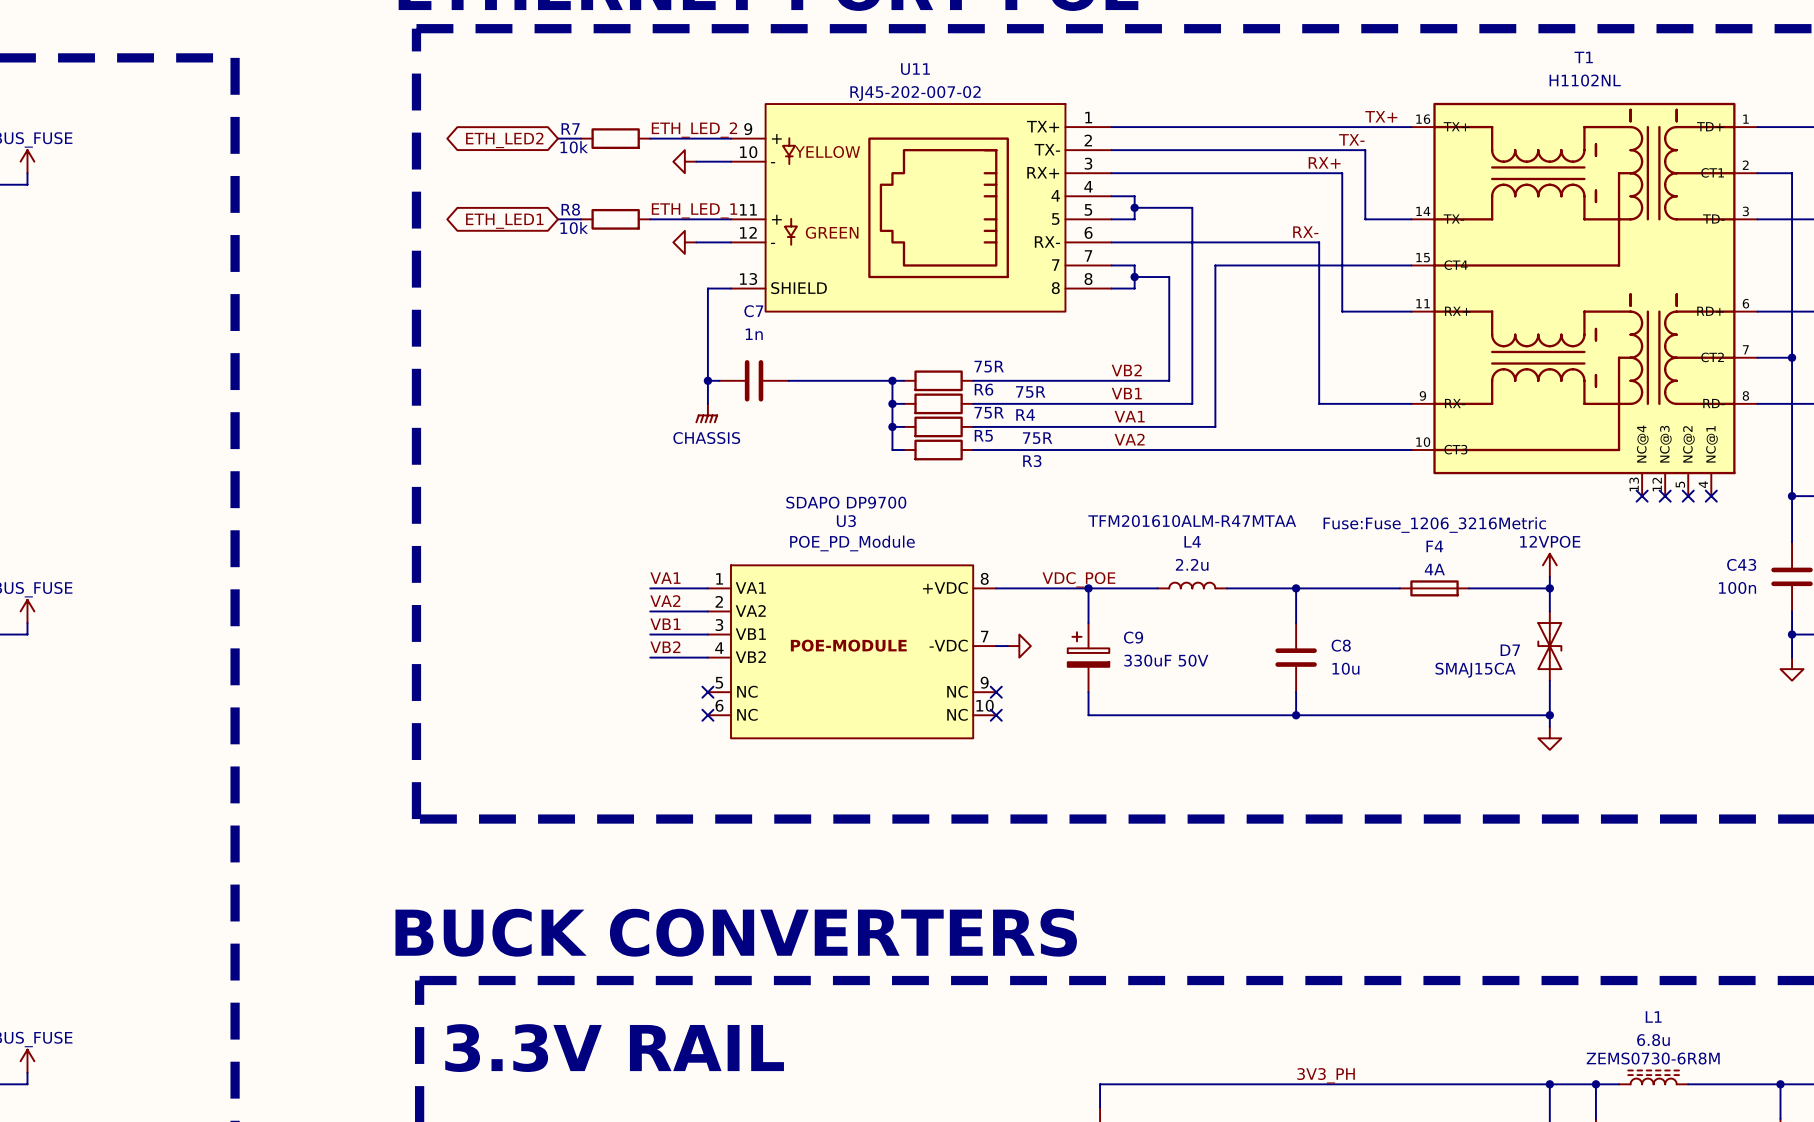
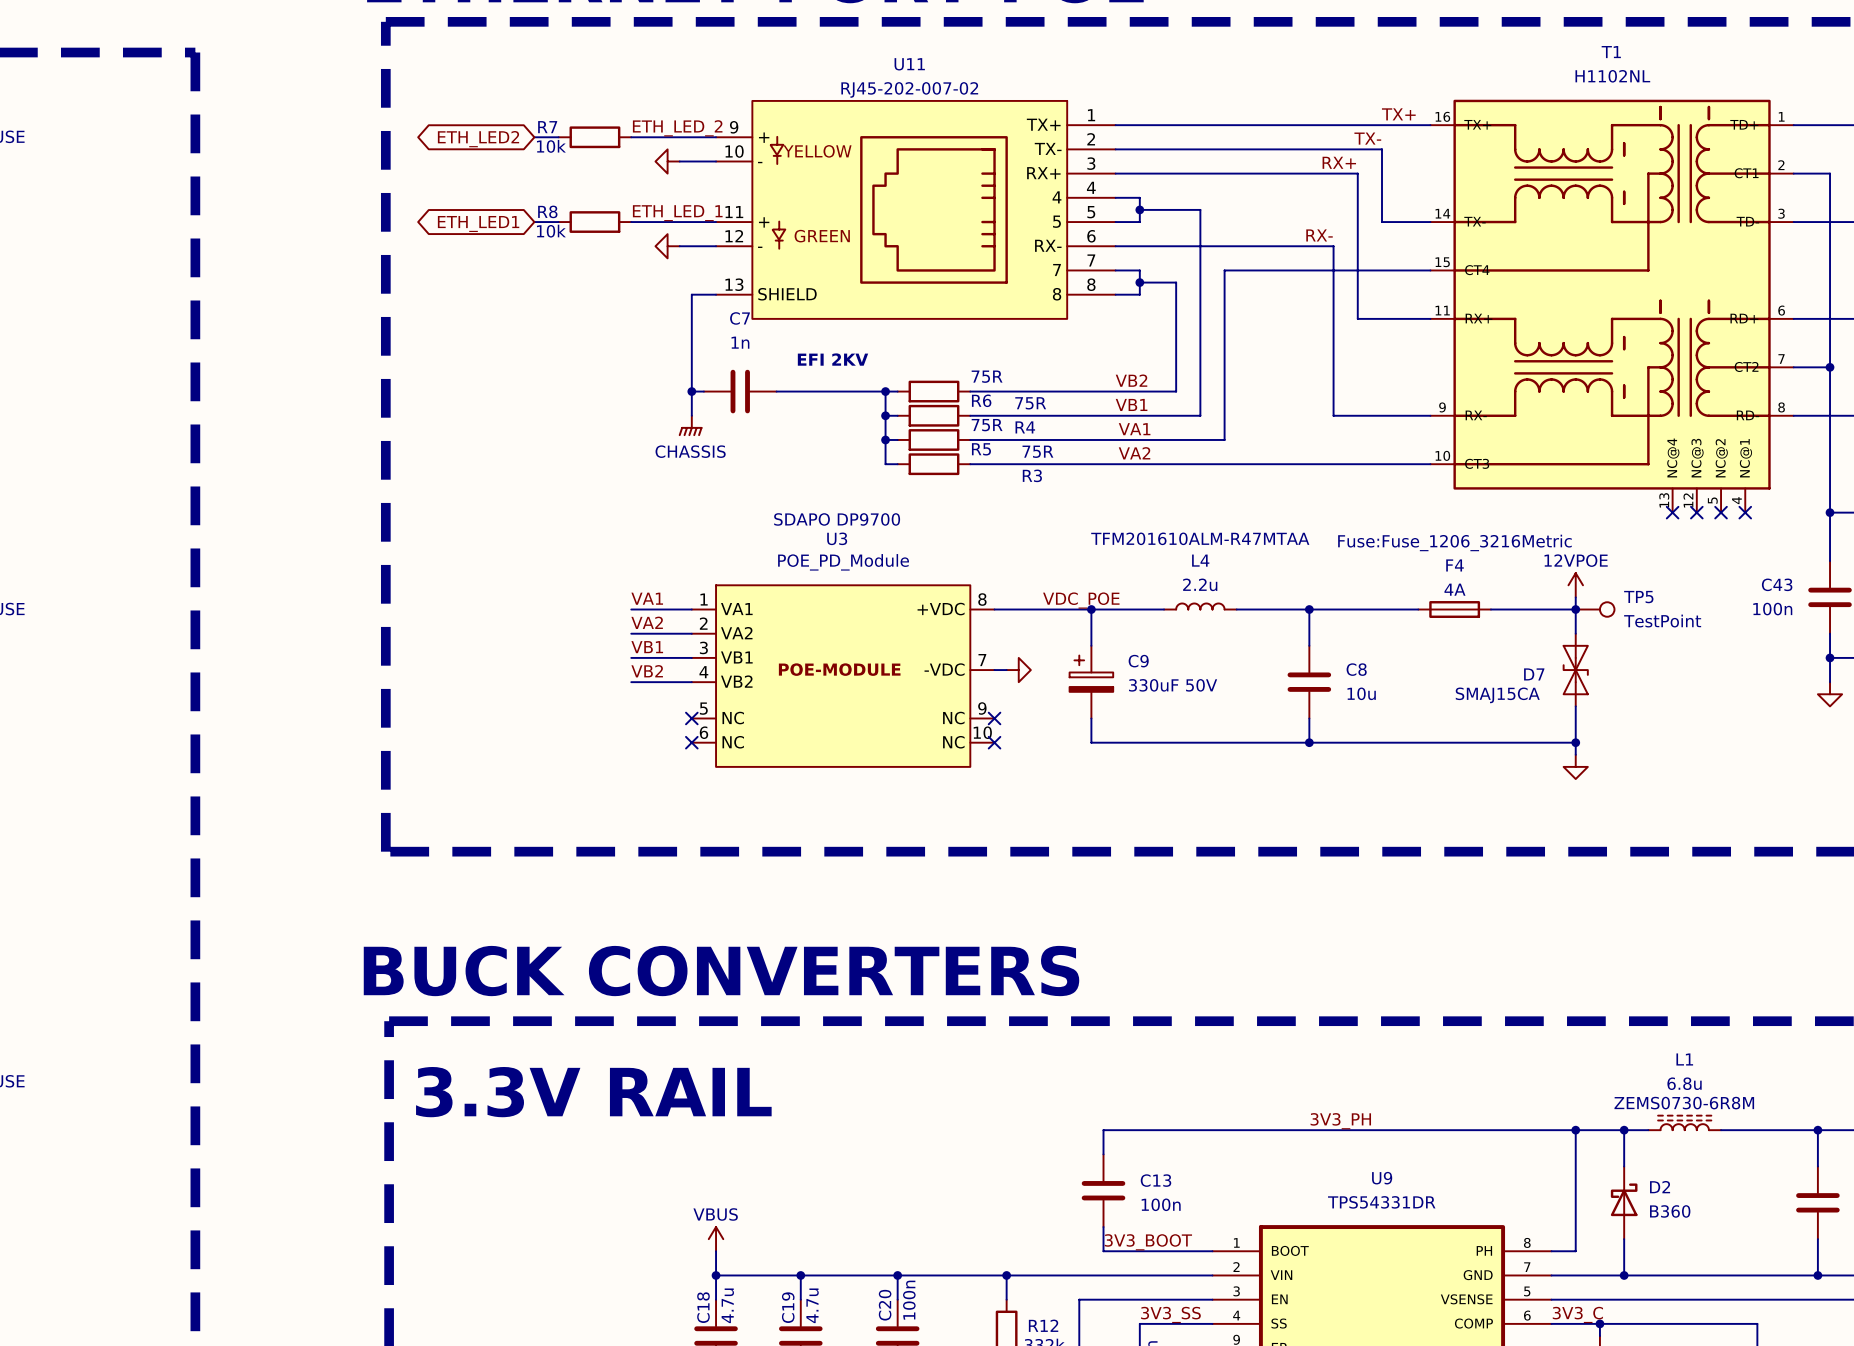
text: none -> EFI 2KV (833, 359)
TP5: none -> TestPoint (1595, 609)

